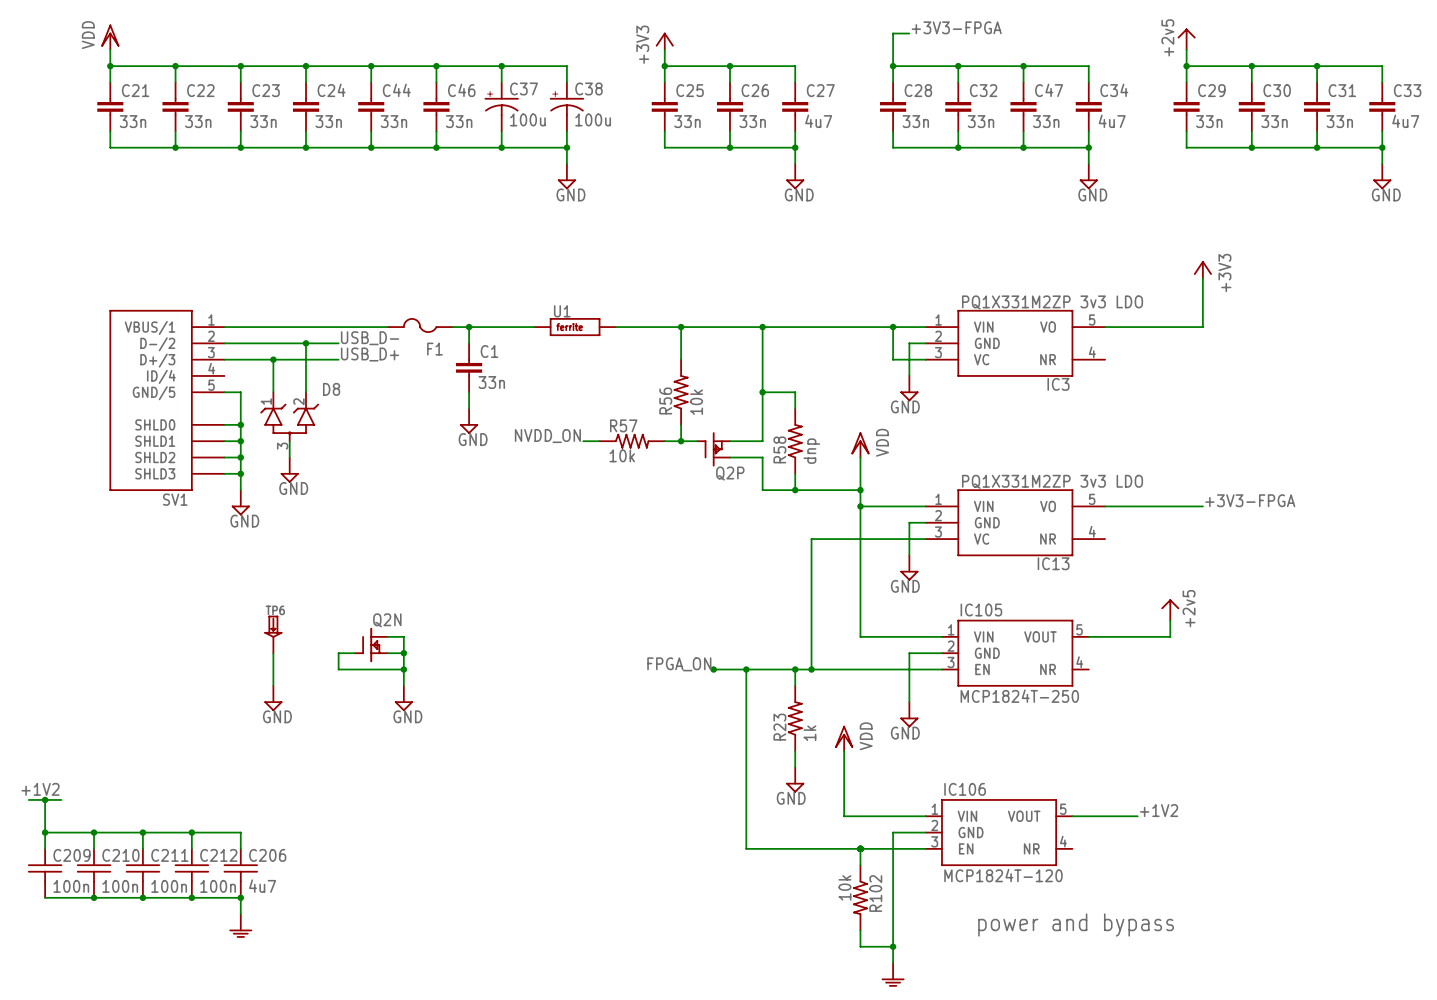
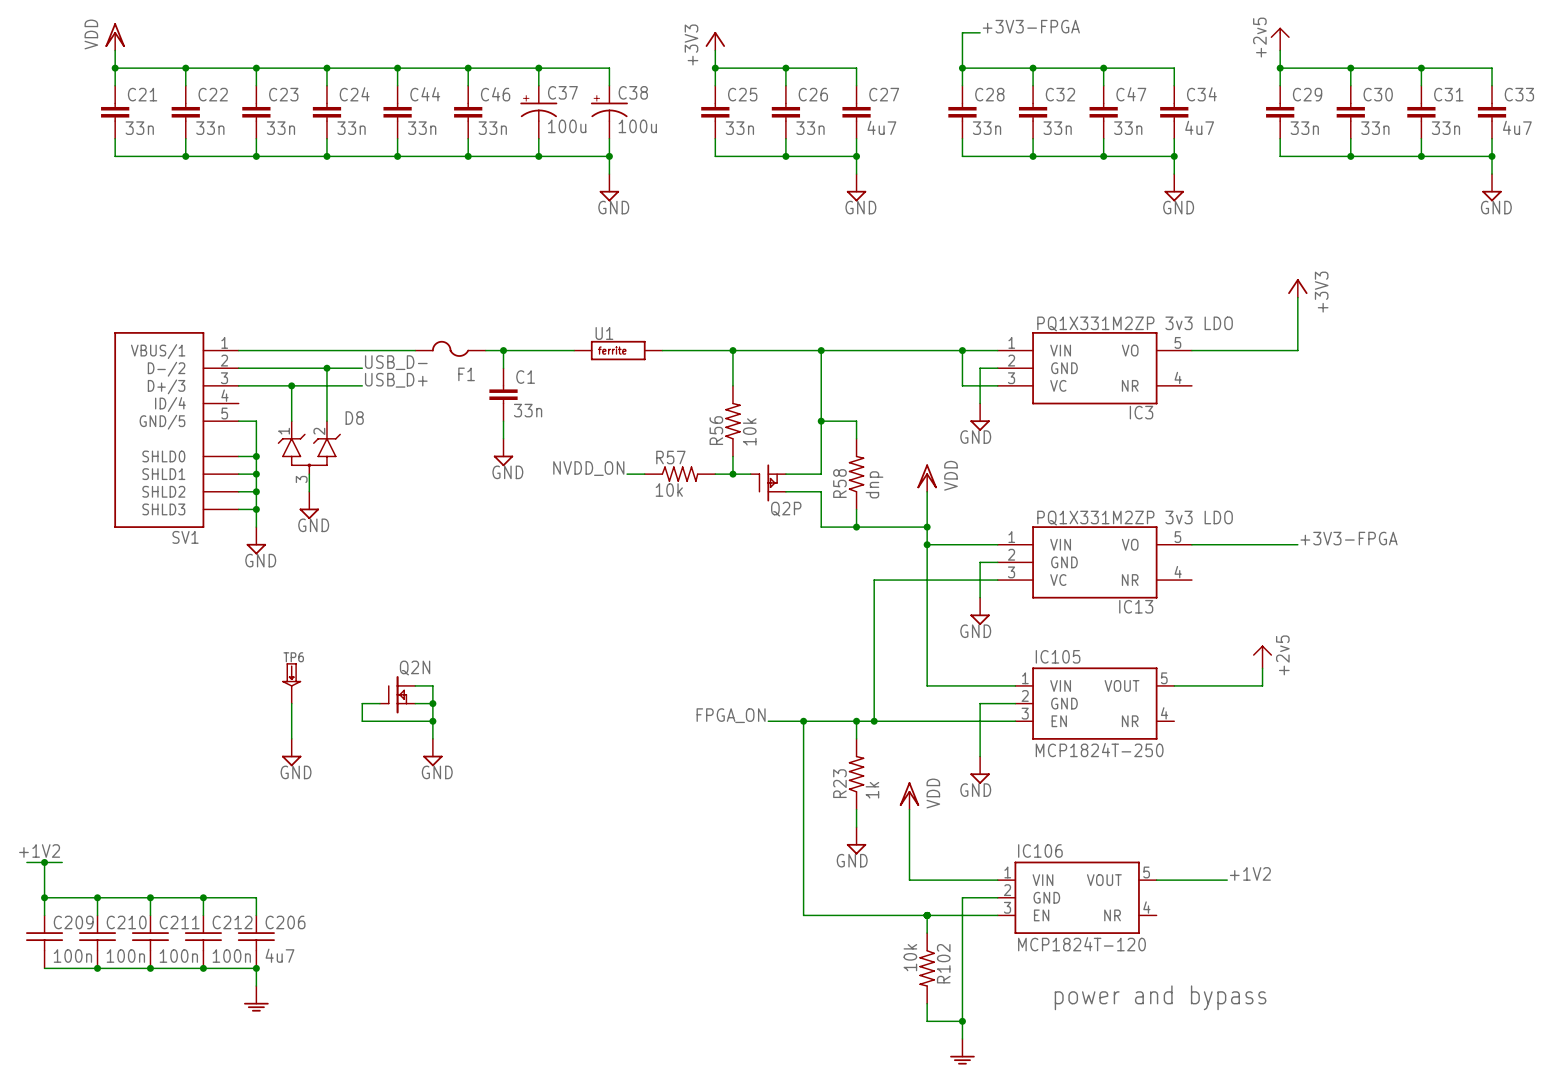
junction: (713, 669) -> none

